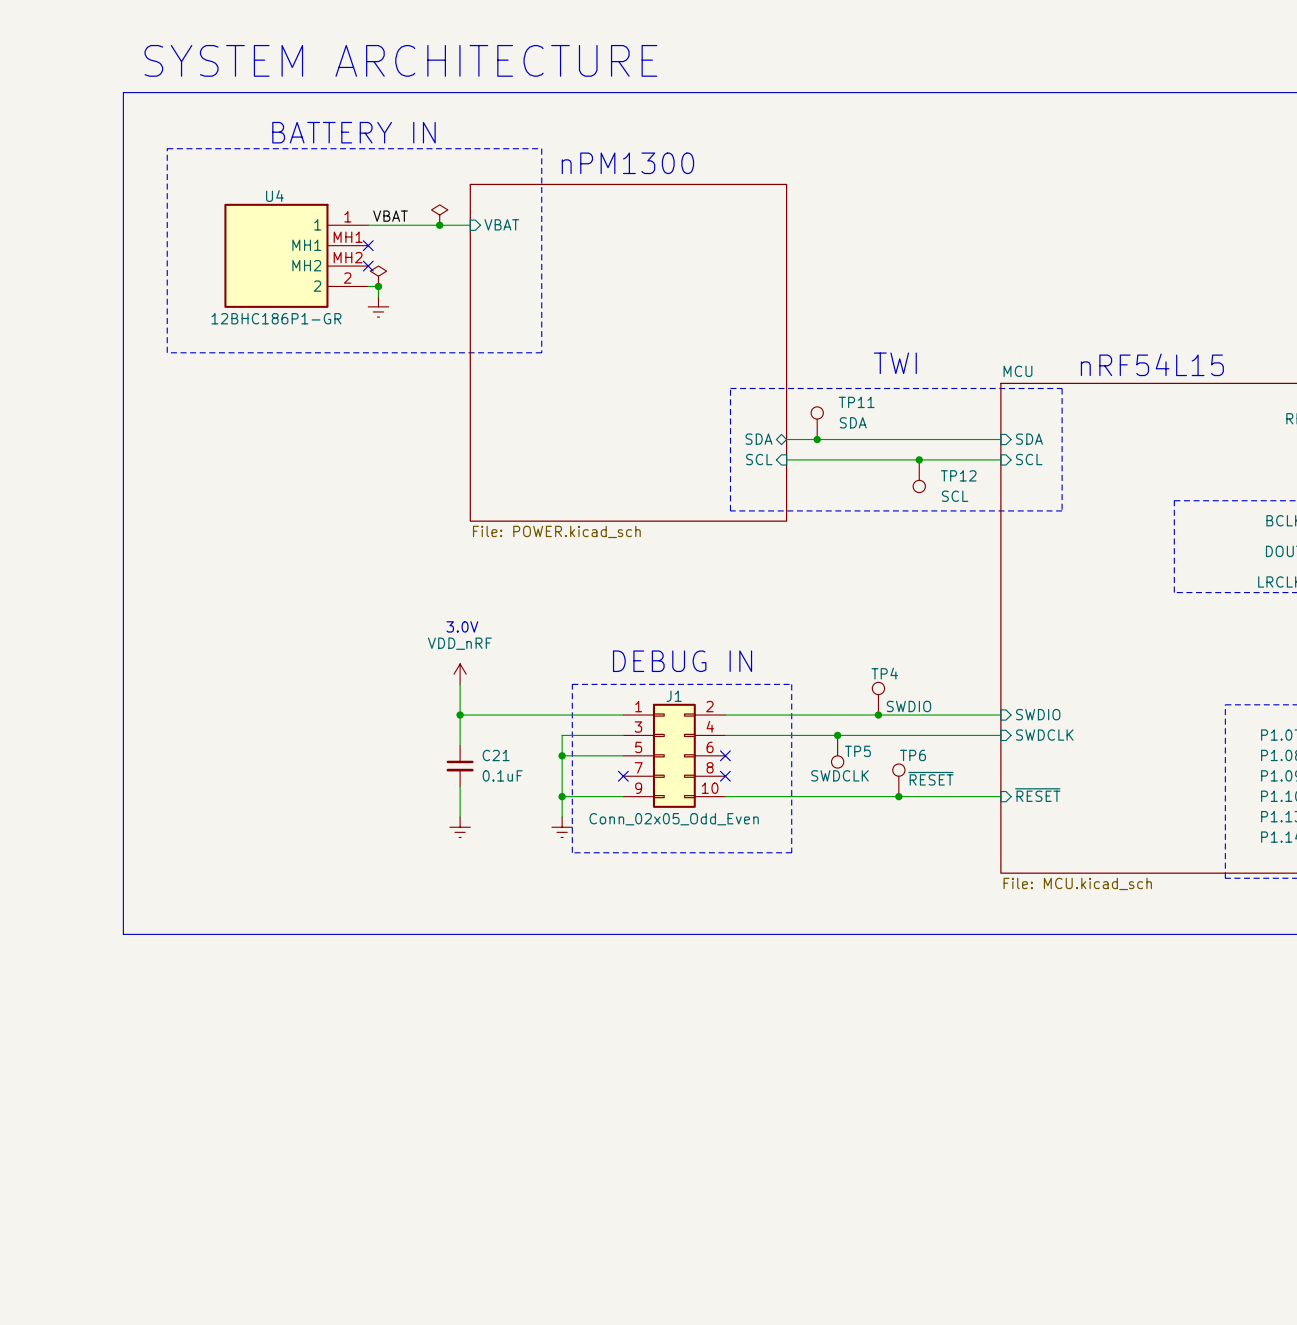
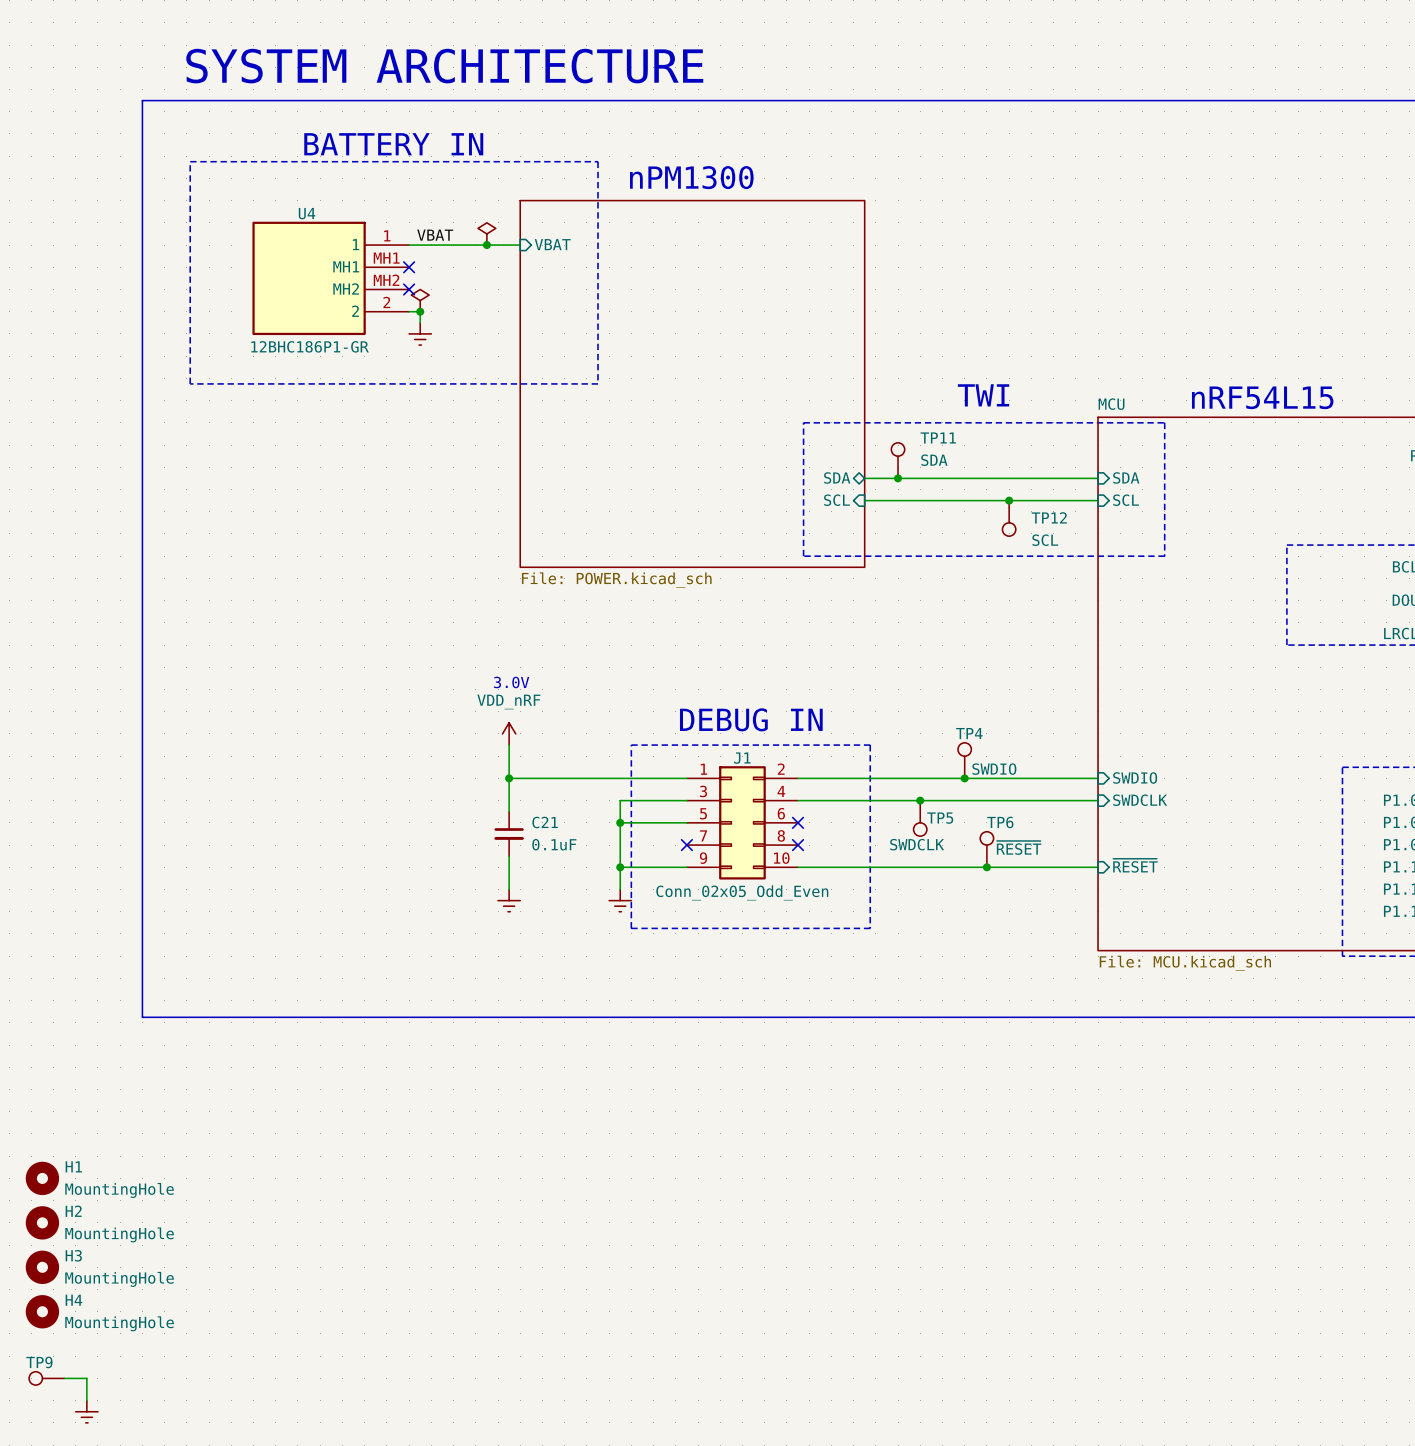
H1: none -> MountingHole (42, 1178)
H2: none -> MountingHole (42, 1222)
H3: none -> MountingHole (42, 1267)
H4: none -> MountingHole (42, 1311)
TP9: none -> (46, 1378)
wire: none -> (64, 1378) (86, 1378) (86, 1400)
power symbol: none -> (86, 1411)

